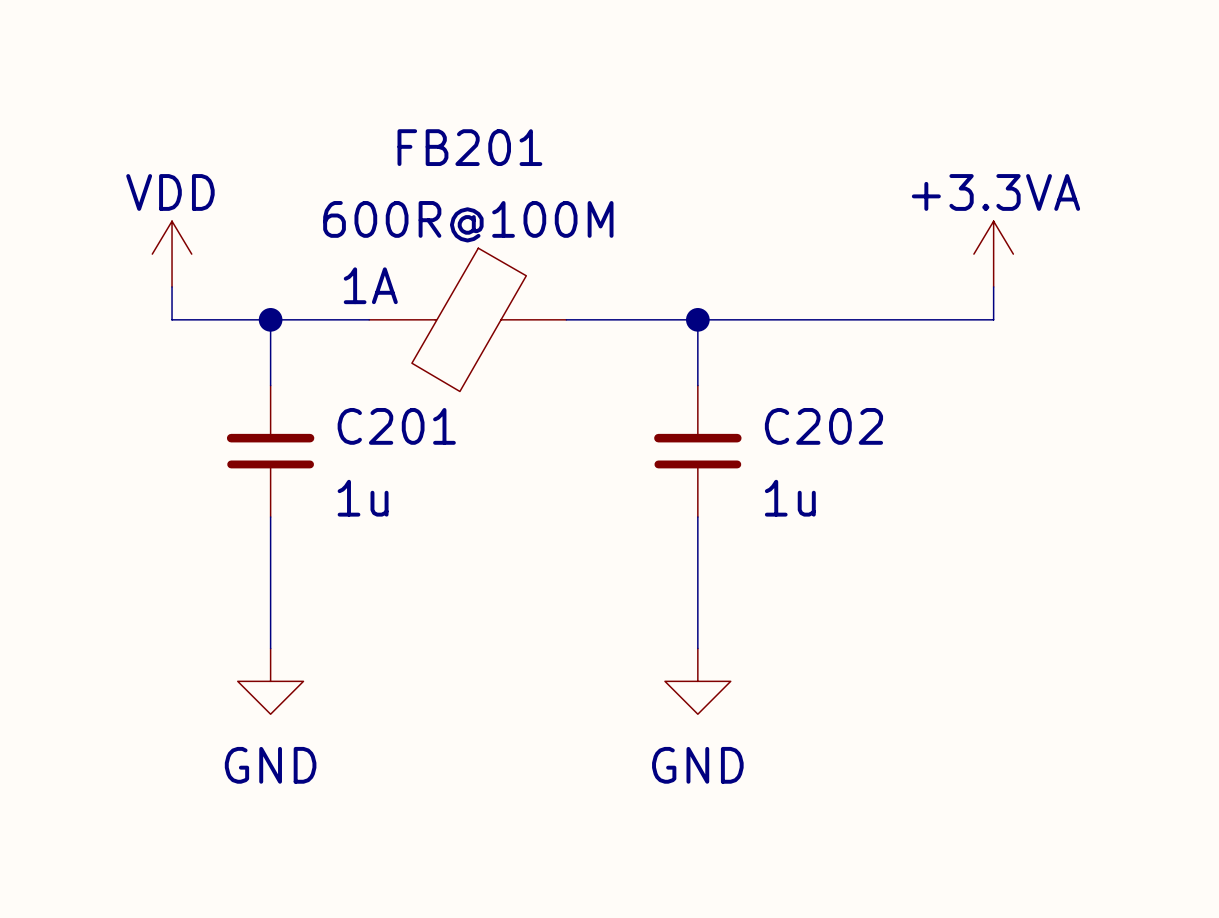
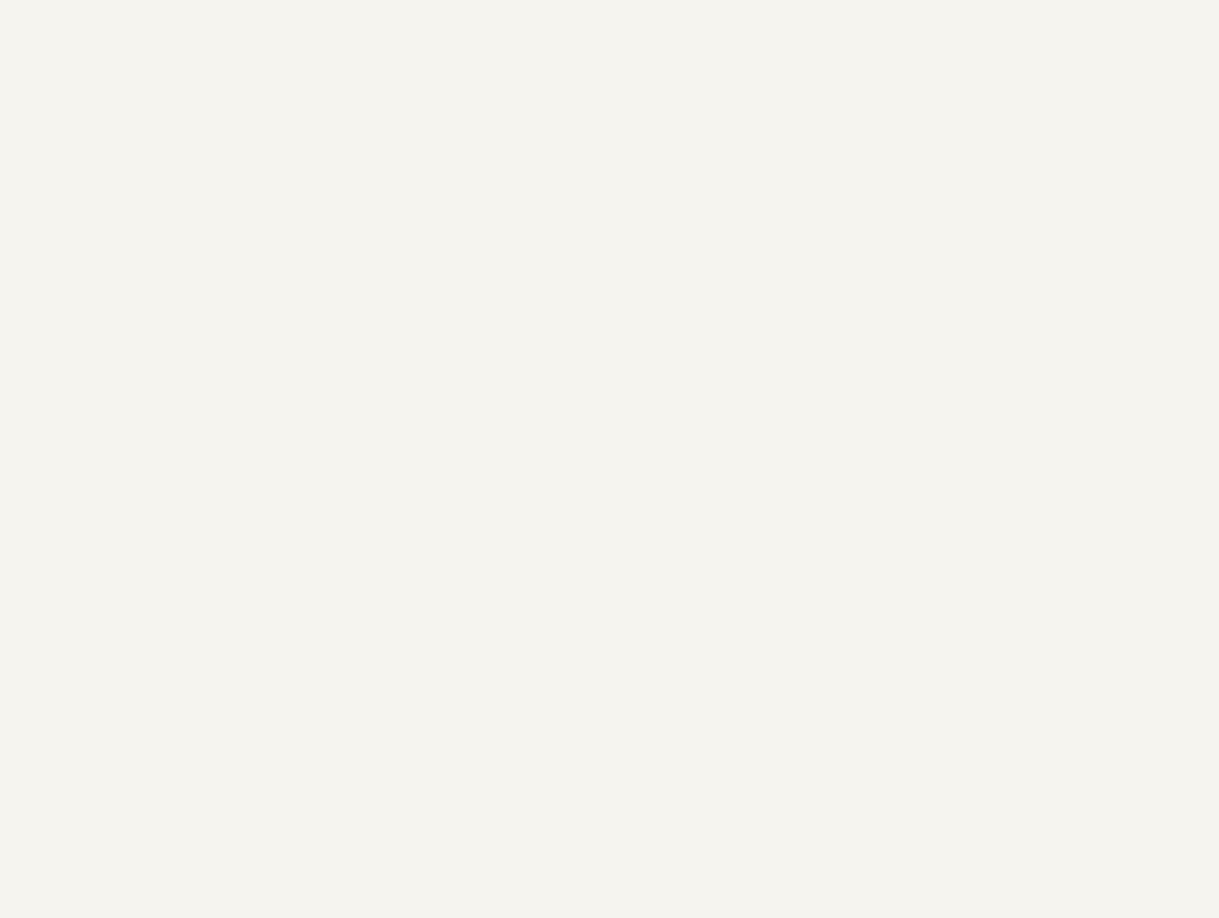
power symbol: VDD (172, 254) -> none
power symbol: +3.3VA (993, 254) -> none
wire: (172, 286) (172, 319) (369, 319) -> none
wire: (993, 286) (993, 319) (566, 319) -> none
wire: (270, 319) (270, 385) -> none
junction: (270, 319) -> none
FB201: 600R@100M (467, 319) -> none
wire: (697, 319) (697, 385) -> none
junction: (697, 319) -> none
C201: 1u (270, 451) -> none
C202: 1u (697, 451) -> none
wire: (270, 517) (270, 648) -> none
wire: (697, 517) (697, 648) -> none
power symbol: GND (270, 681) -> none
power symbol: GND (697, 681) -> none

